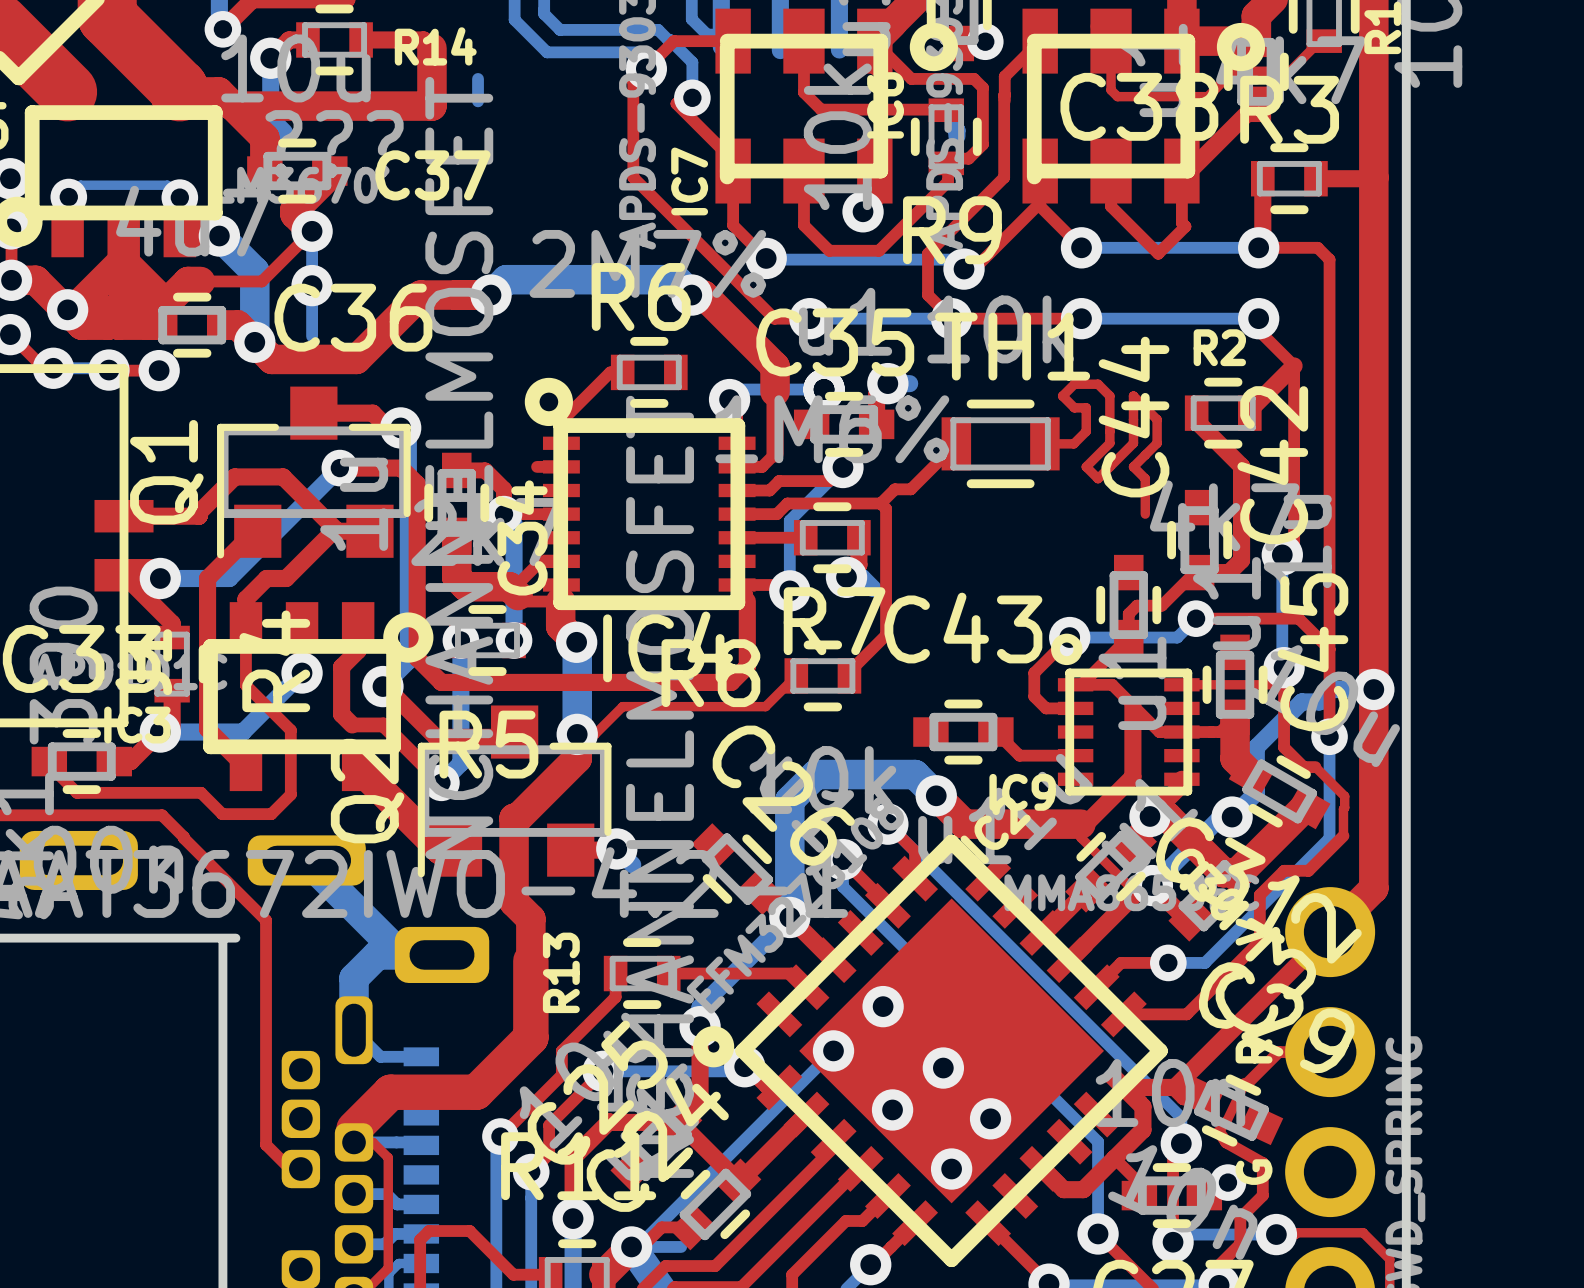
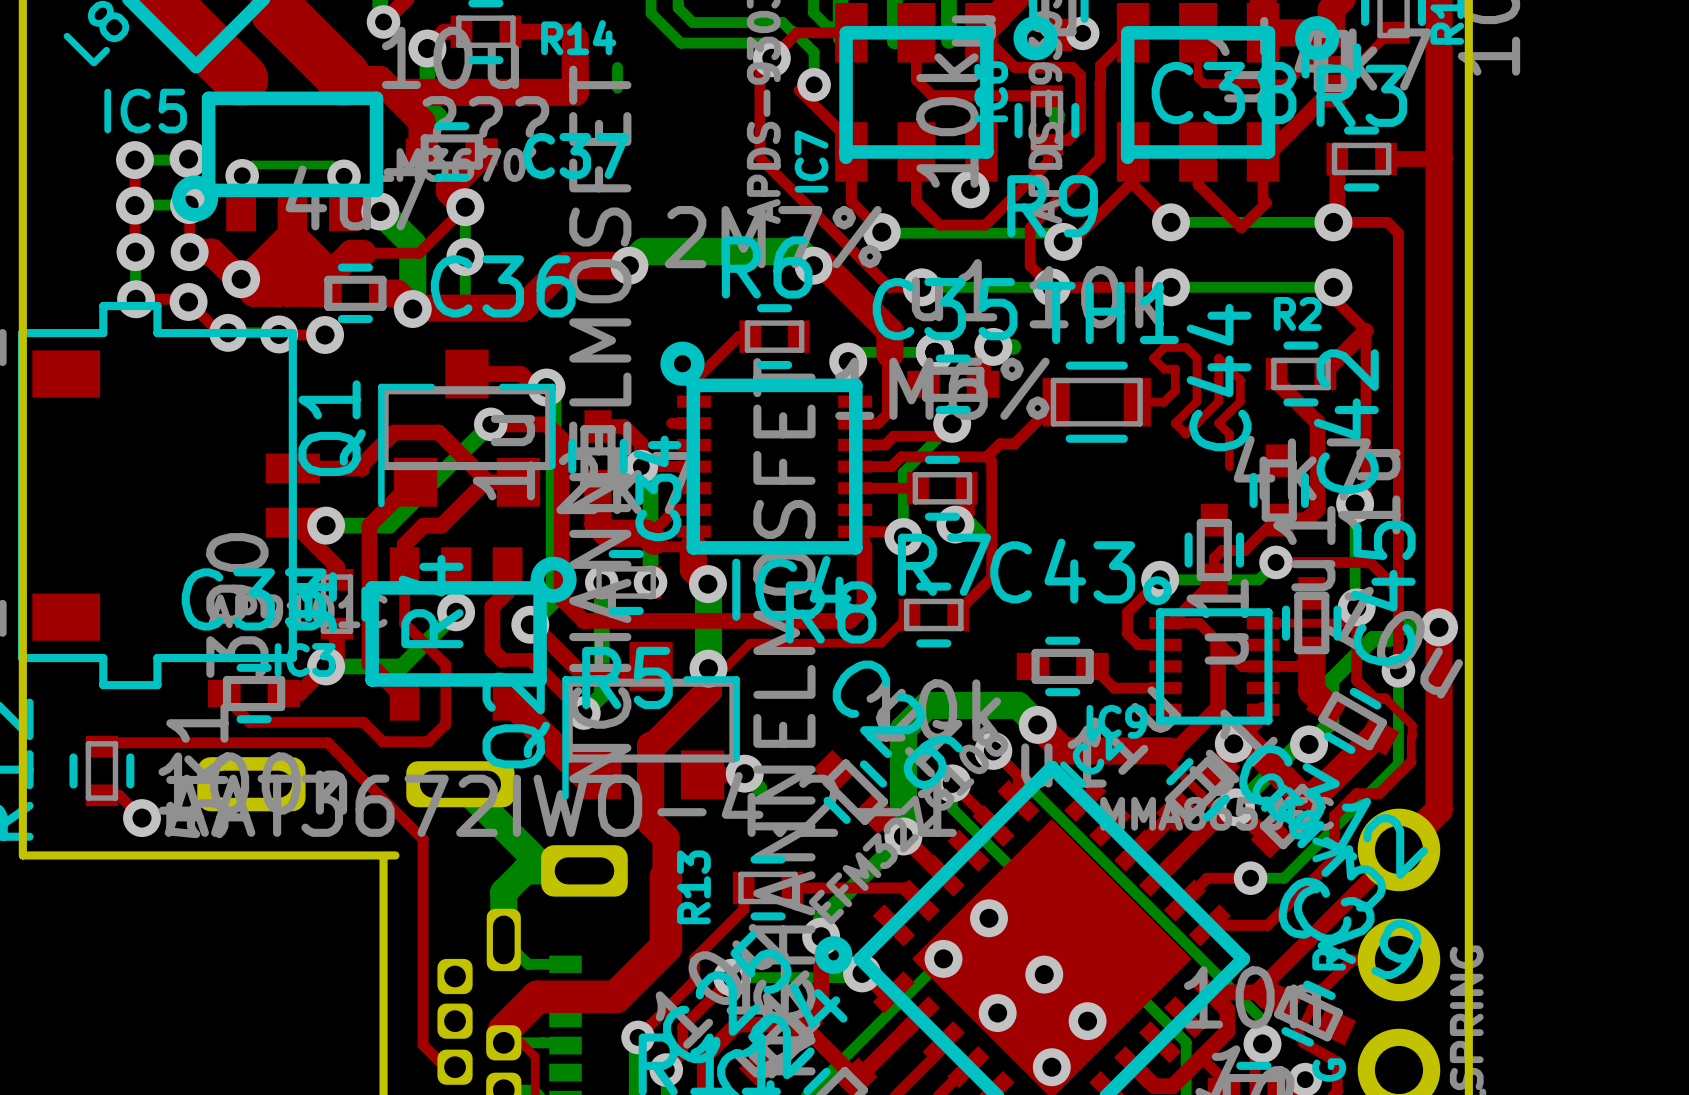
top track: (374, 341) (356, 359) (271, 359) (254, 342) -> (522, 308) (412, 309)

